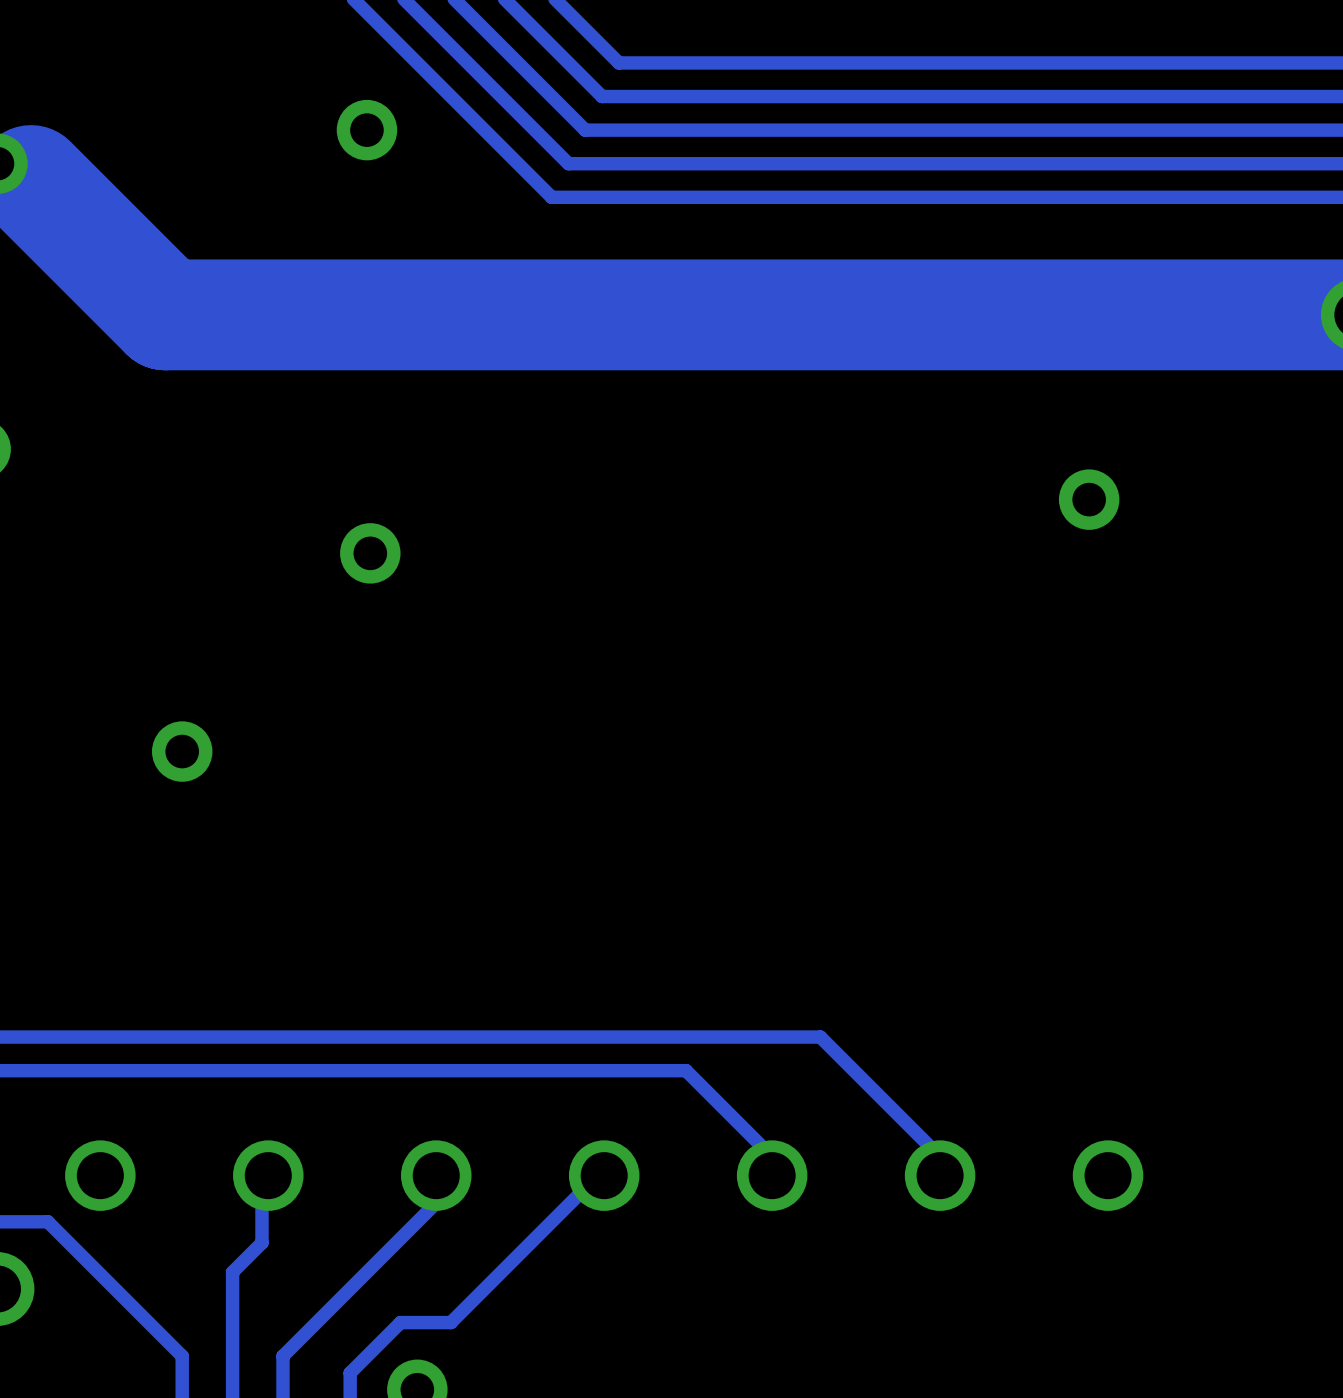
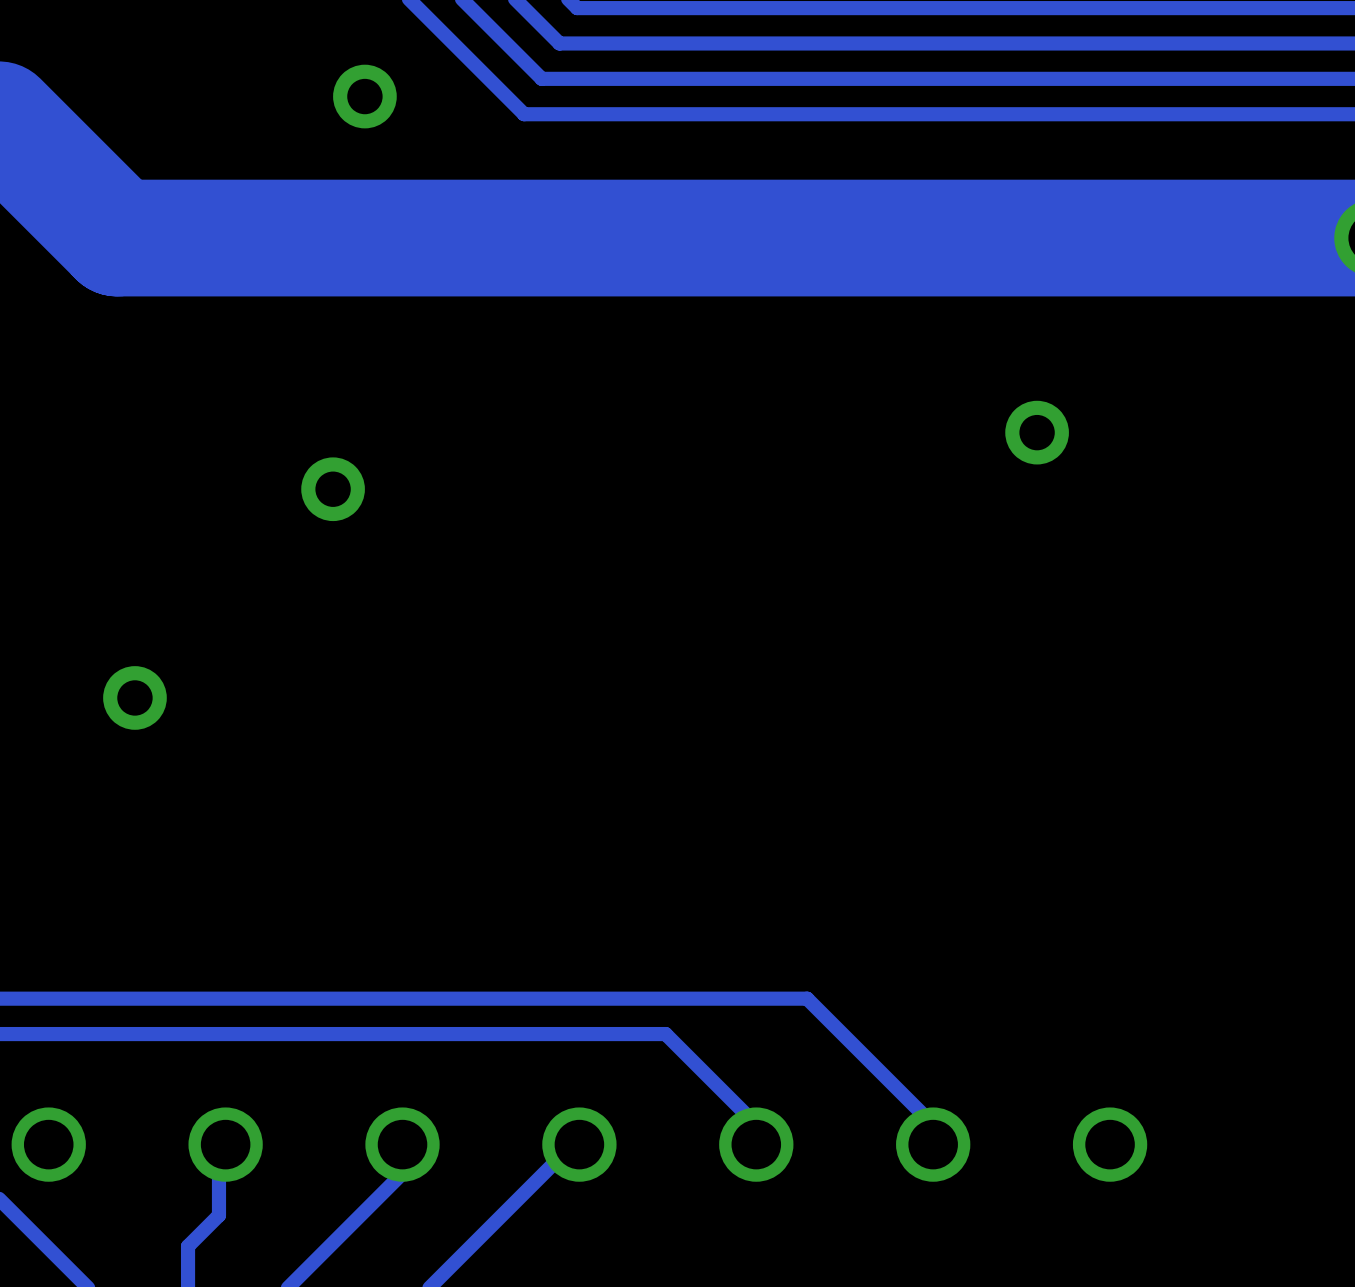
via position: (366, 130) -> (364, 96)
via position: (1089, 499) -> (1037, 432)

